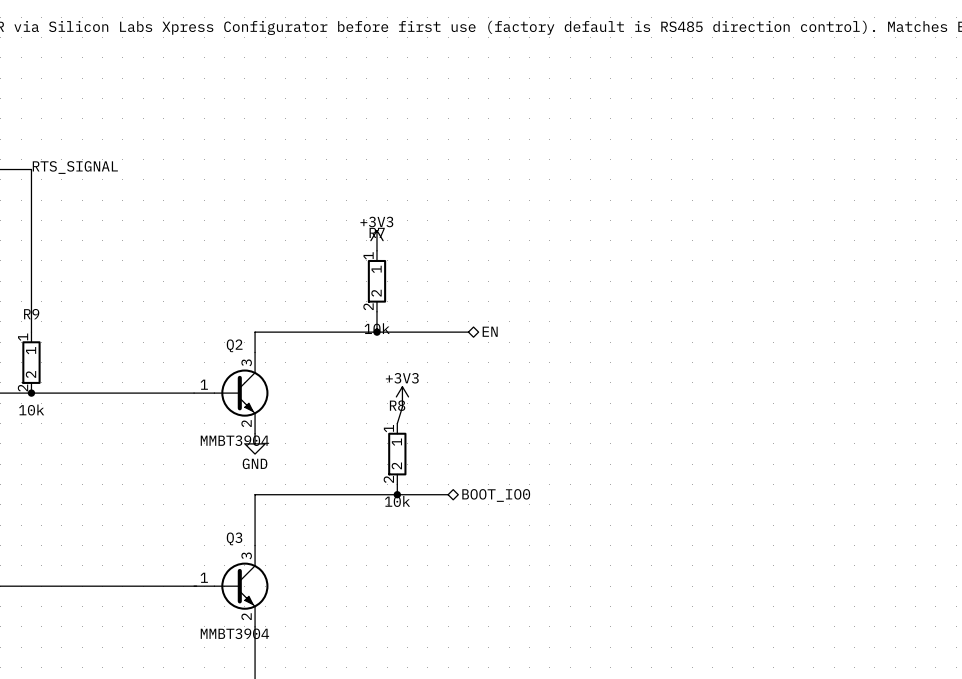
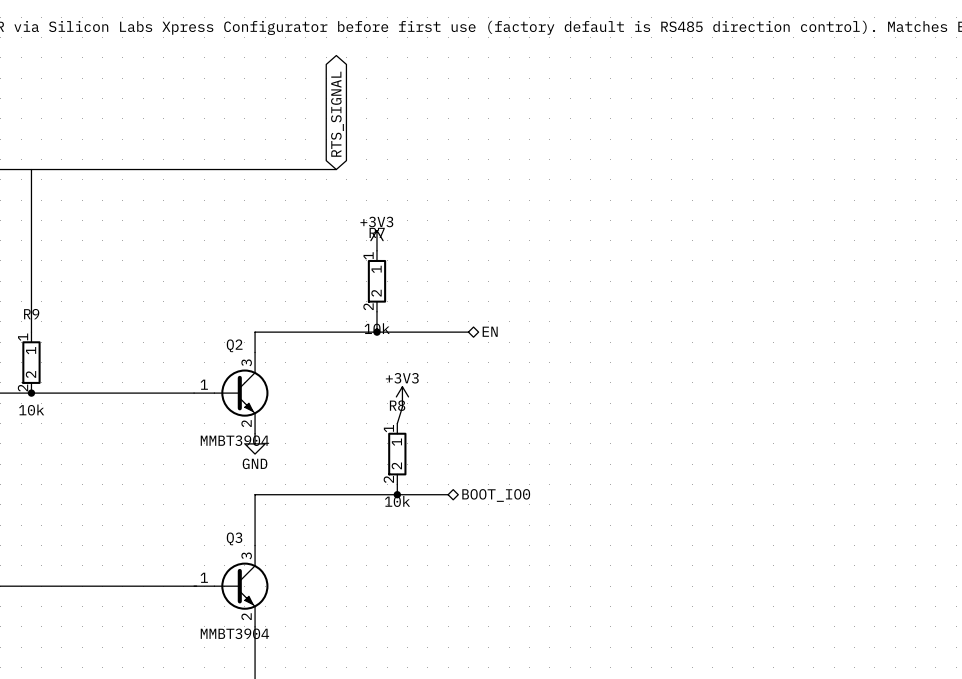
global label: none -> RTS_SIGNAL (337, 114)
label: RTS_SIGNAL (75, 167) -> none
wire: none -> (31, 169) (336, 169)

